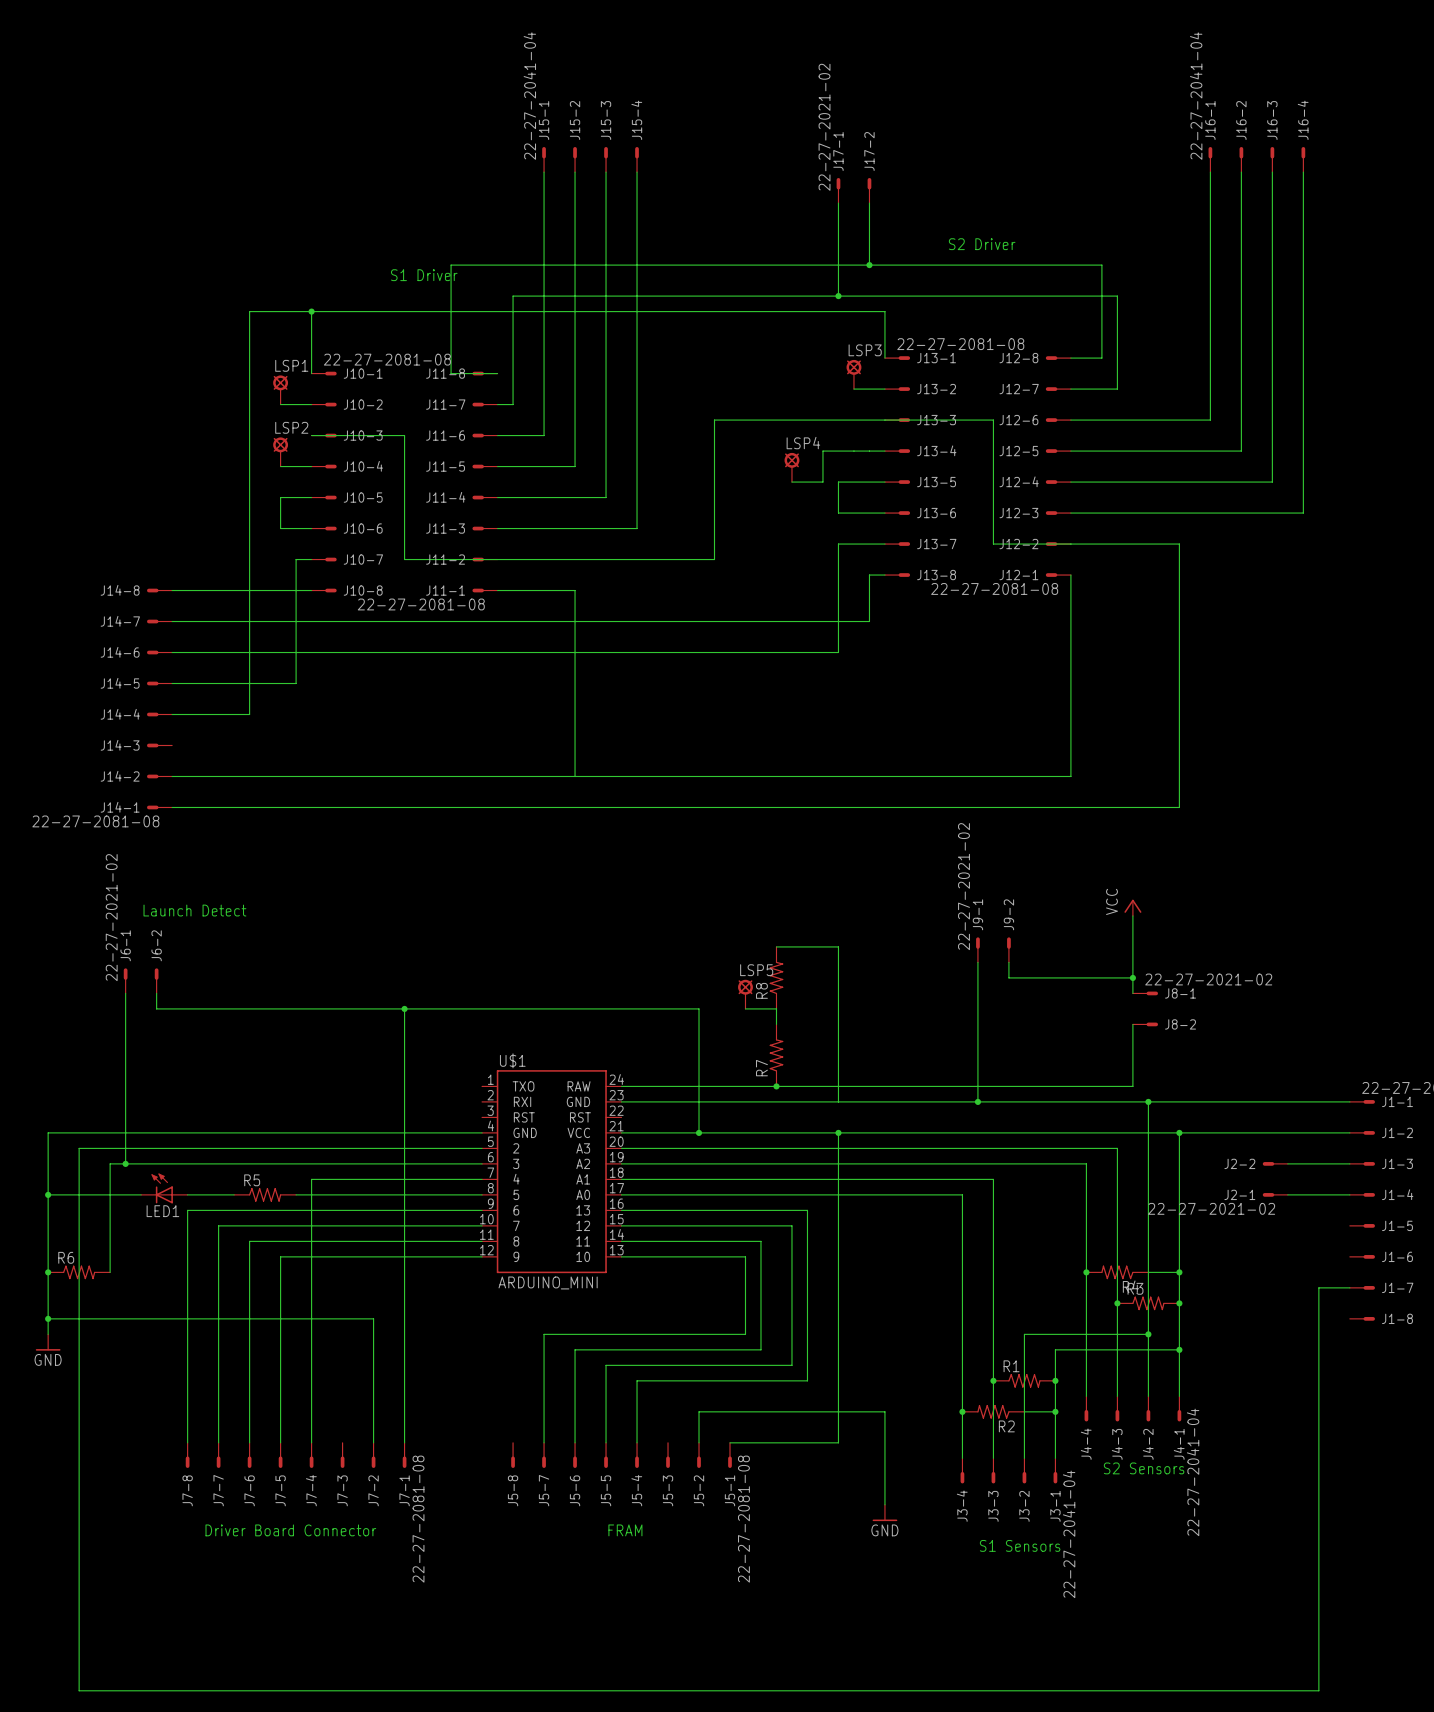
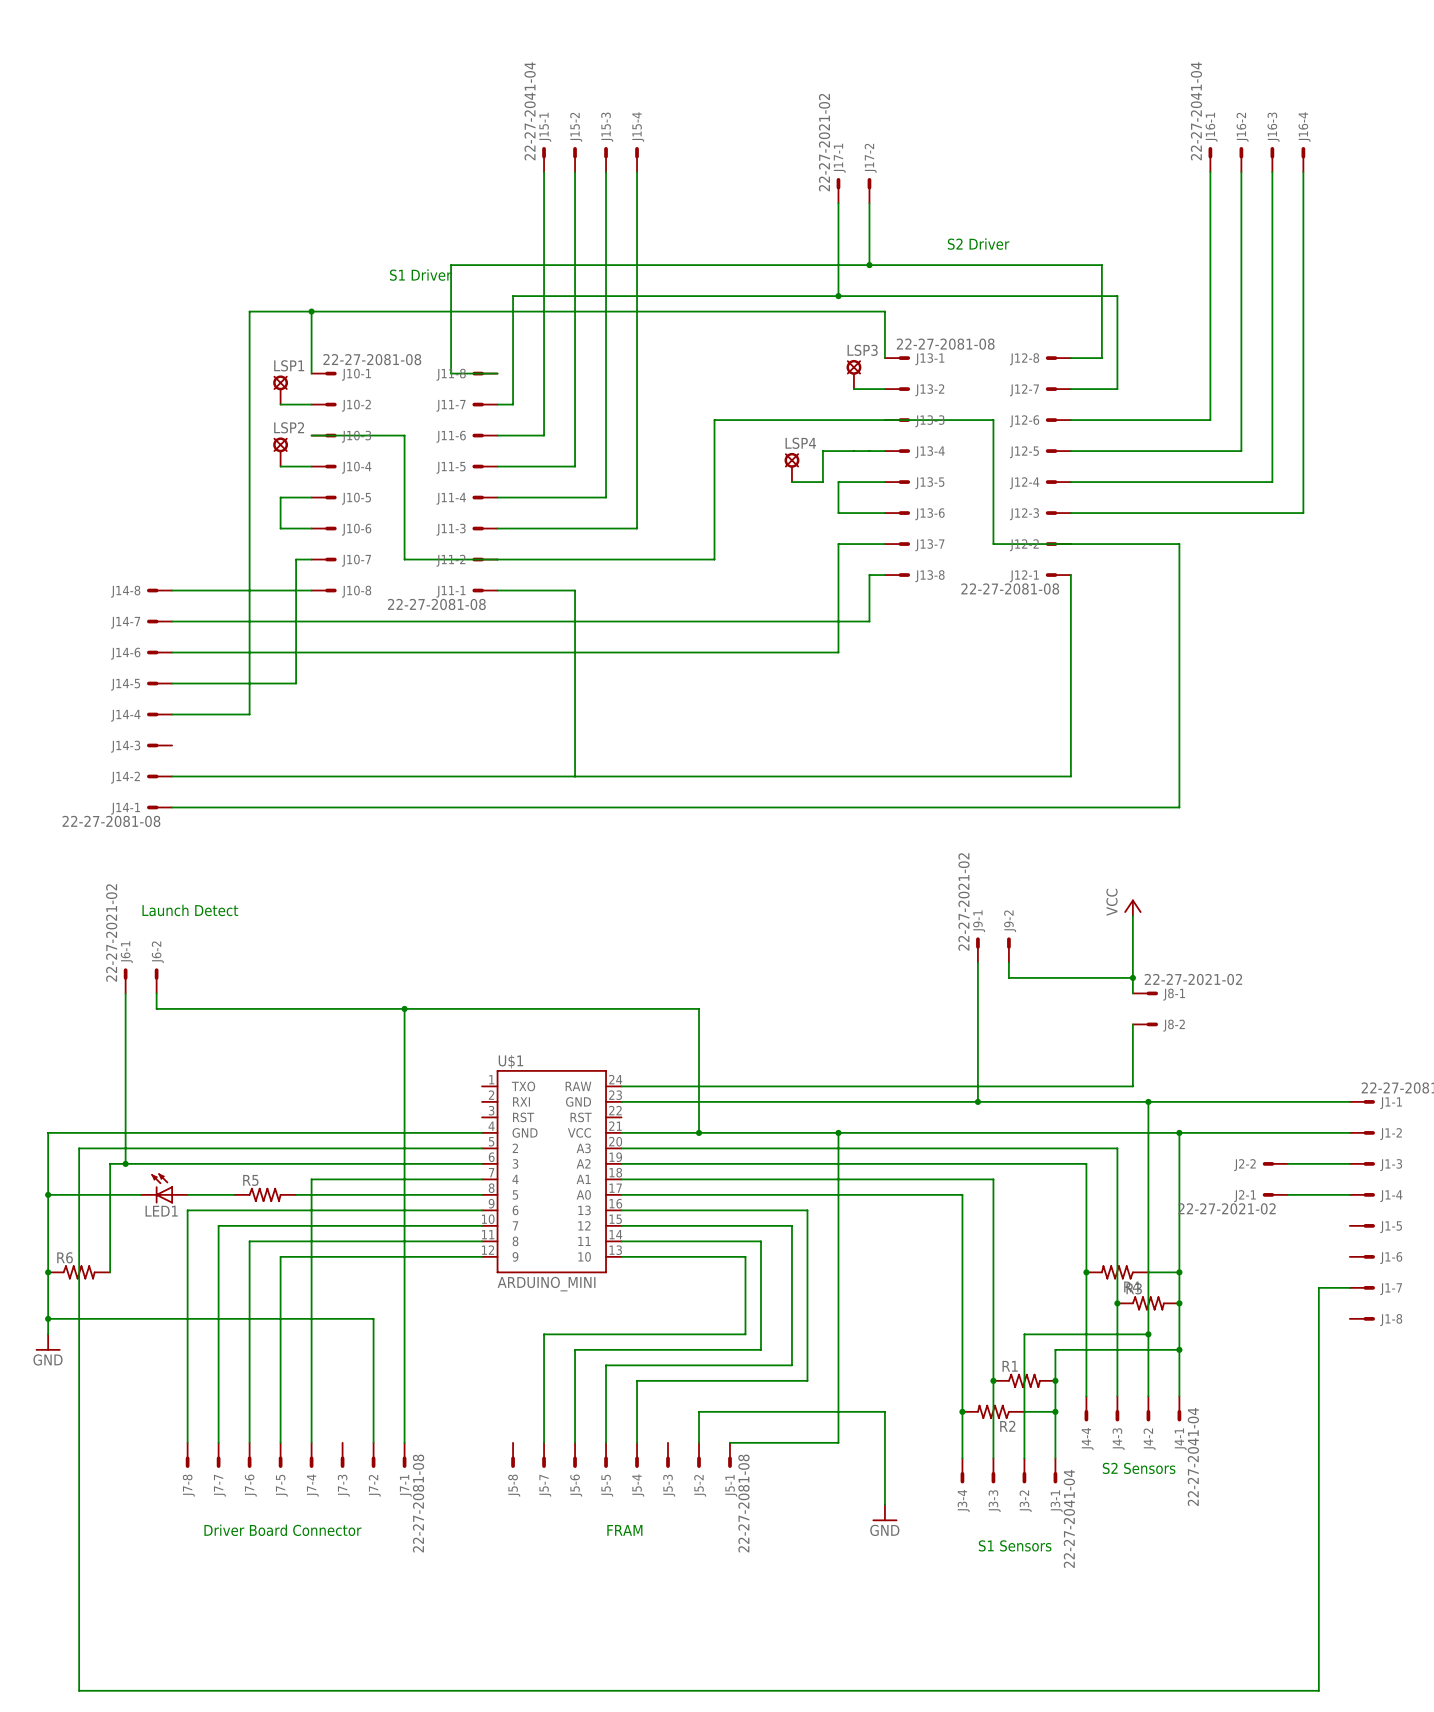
wire: (776, 946) (838, 946) (838, 1101) -> none
R8: (776, 977) -> none
LSP5: (745, 994) -> none
wire: (745, 1008) (776, 1008) (776, 1024) -> none
R7: (776, 1055) -> none
junction: (776, 1086) -> none

